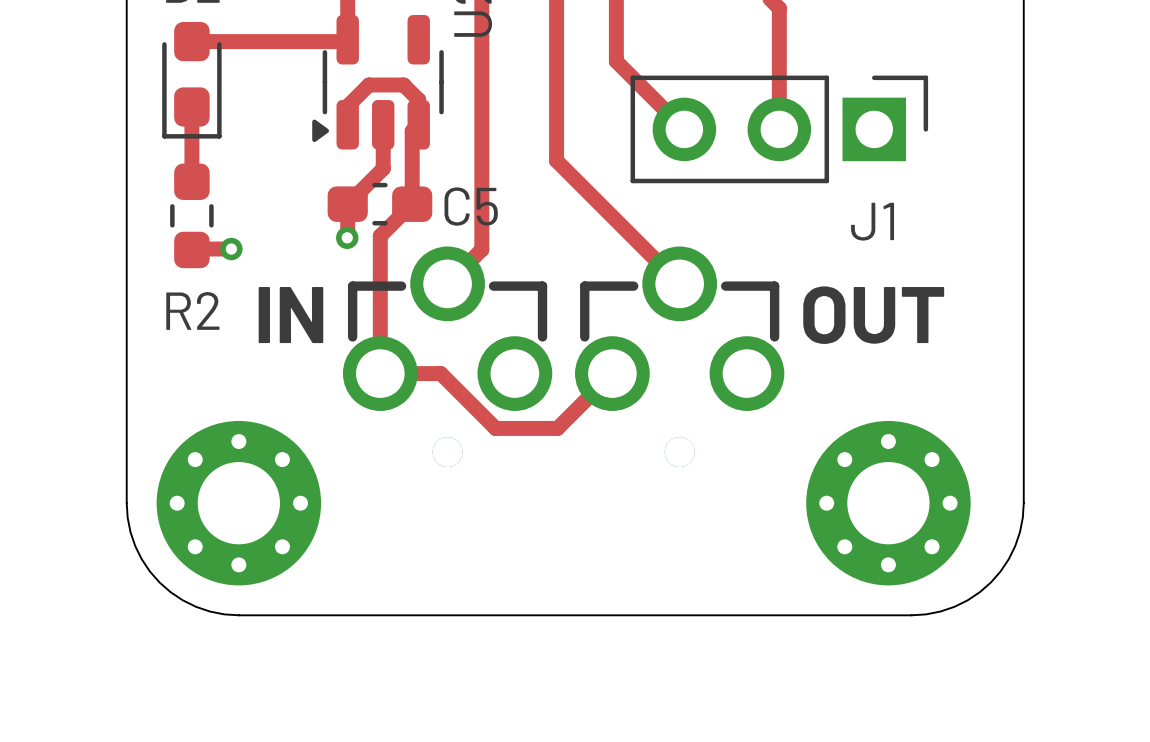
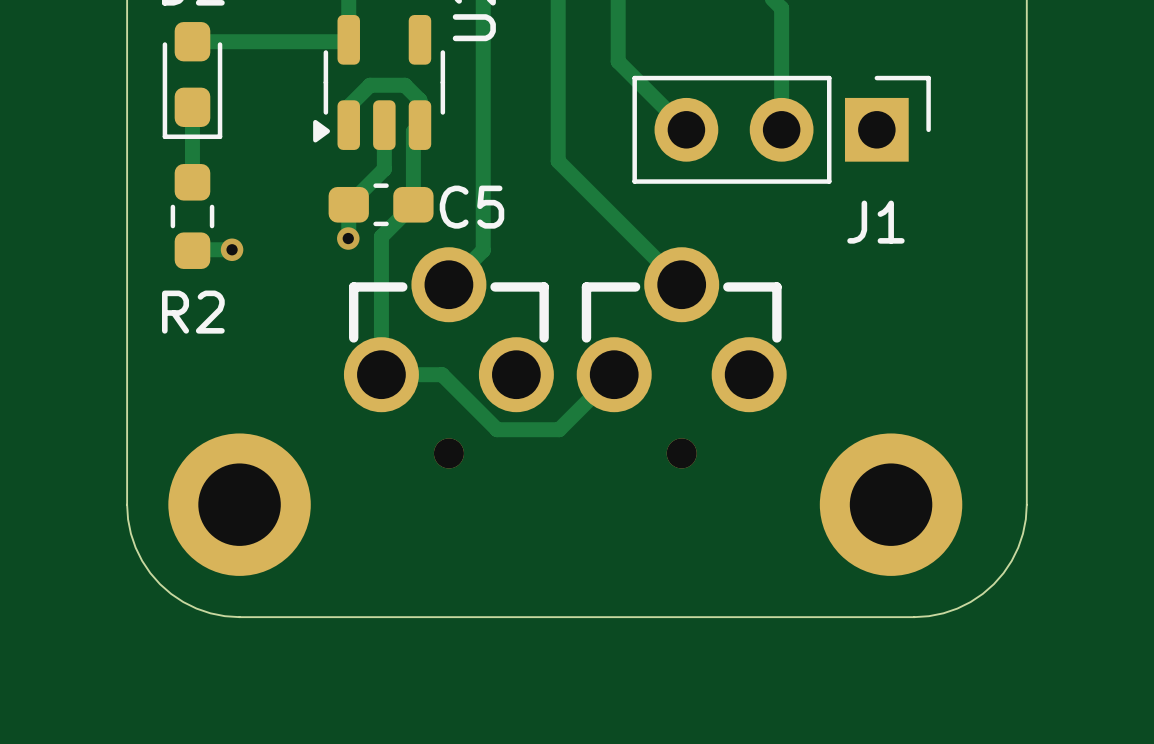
text: IN (290, 315) -> none
text: OUT (873, 315) -> none
part footprint: [156, 420, 322, 586] -> [168, 433, 311, 576]
part footprint: [806, 420, 971, 586] -> [819, 433, 963, 576]

